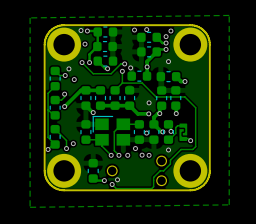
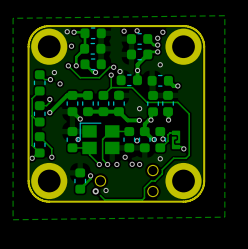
via: none -> (78, 139)
via: (73, 143) -> none
track: none -> (90, 175) (90, 178) (80, 189)
via: none -> (90, 175)
track: (104, 180) (95, 180) -> none
via: (104, 180) -> none
via: none -> (95, 191)
via: (112, 184) -> none

